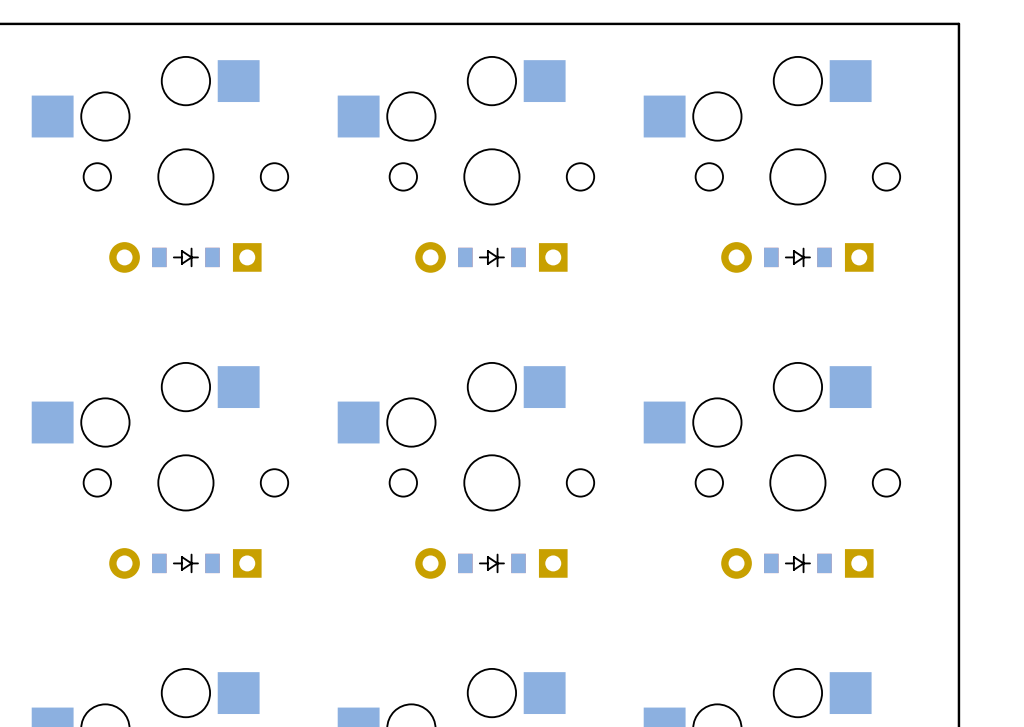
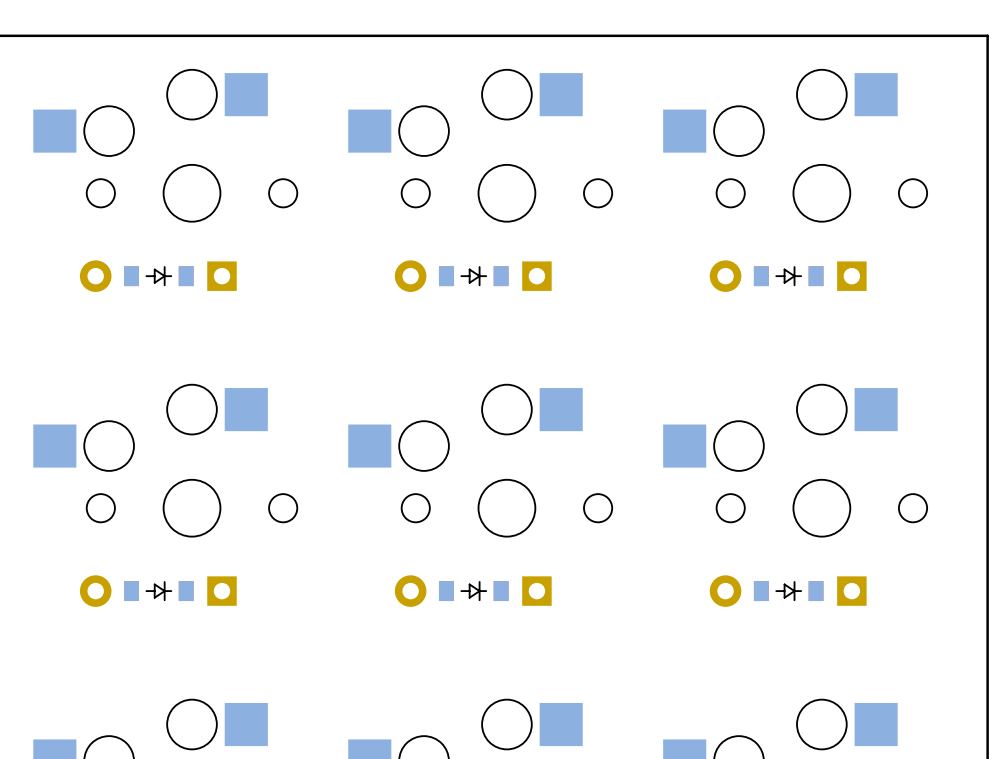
part position: (185, 257) -> (158, 276)
part position: (491, 257) -> (473, 276)
part position: (797, 257) -> (788, 276)
part position: (185, 563) -> (158, 591)
part position: (491, 563) -> (473, 591)
part position: (797, 563) -> (788, 591)

